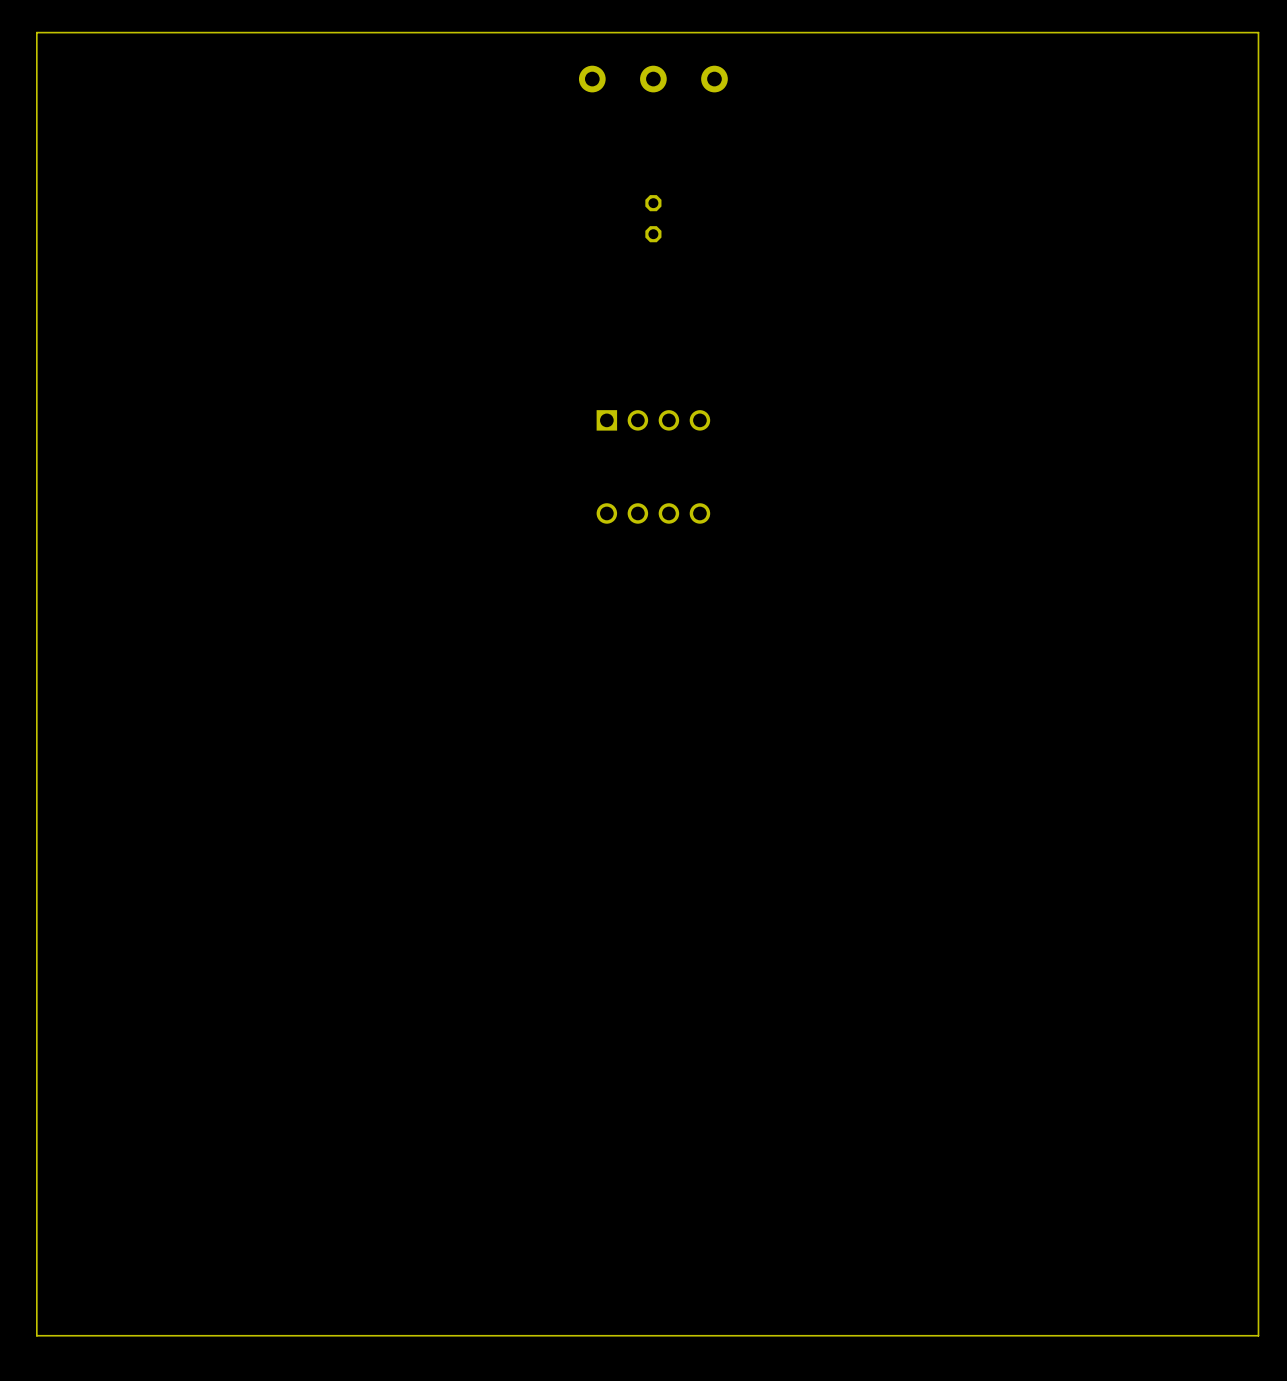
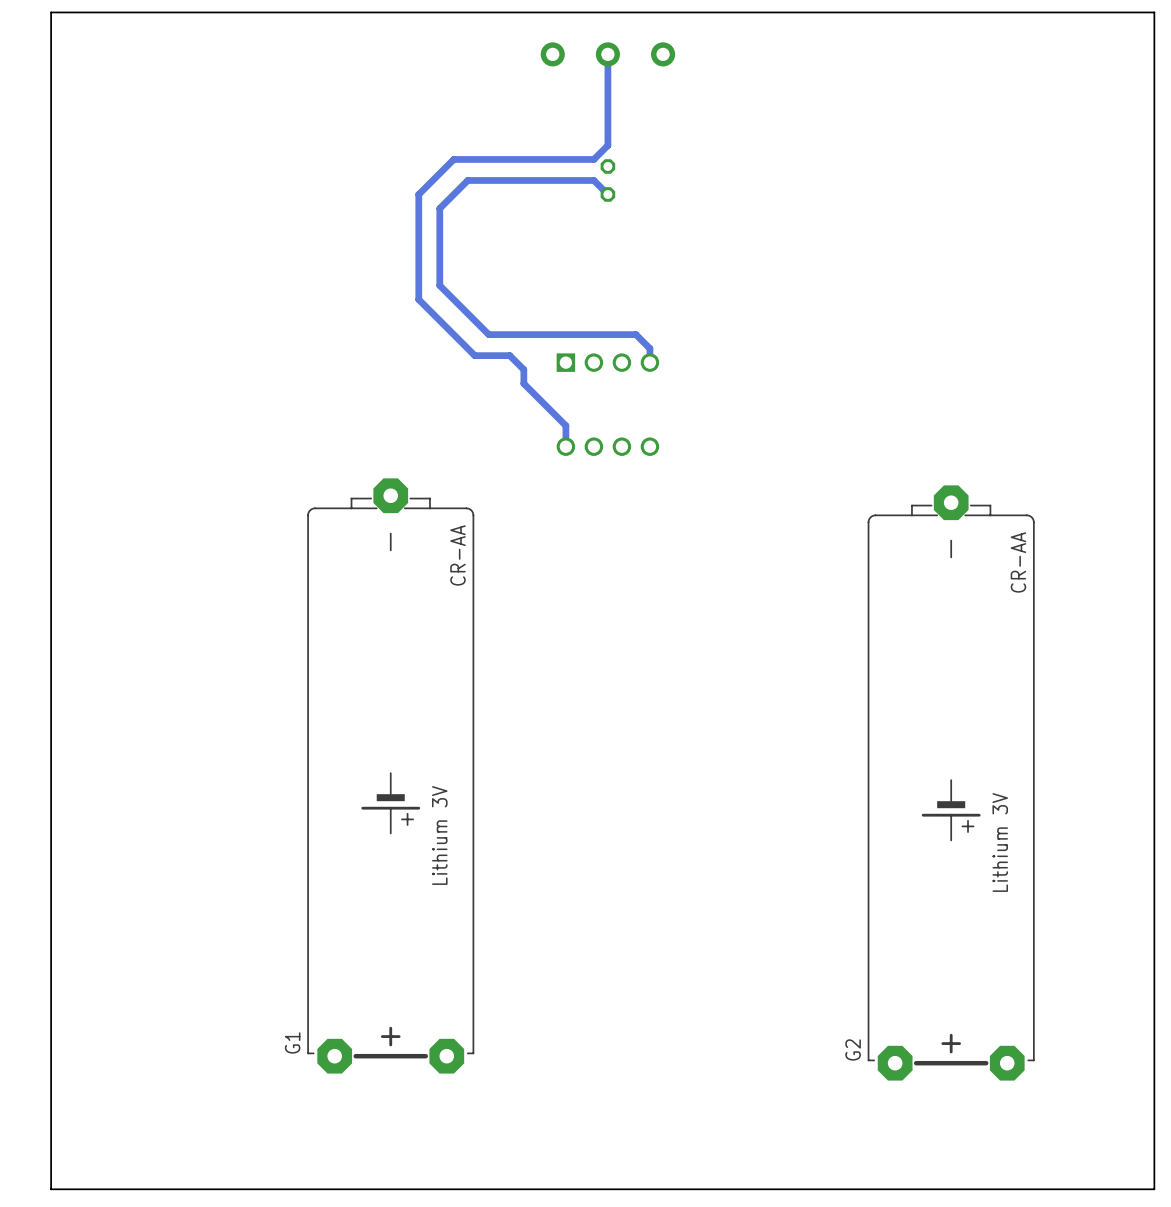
track: none -> (607, 54) (607, 145) (593, 159) (453, 159) (418, 194) (418, 299) (474, 355) (509, 355) (523, 369) (523, 383) (565, 425) (565, 446)
track: none -> (607, 194) (593, 180) (467, 180) (439, 208) (439, 285) (488, 334) (635, 334) (649, 348) (649, 362)
G1: none -> (390, 775)
G2: none -> (951, 782)

